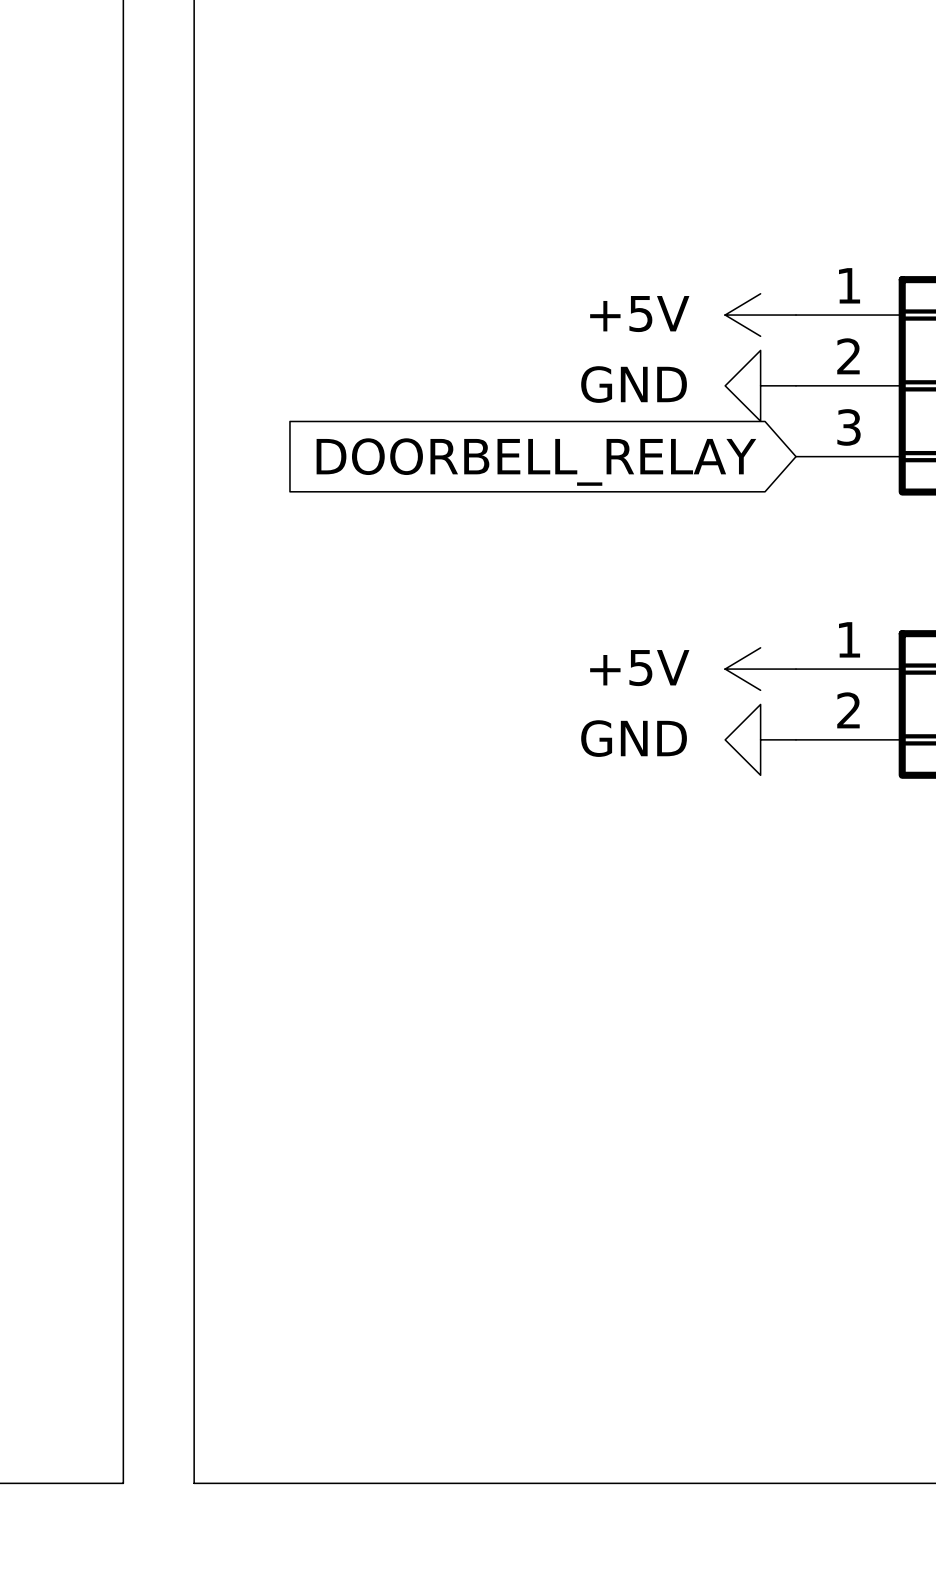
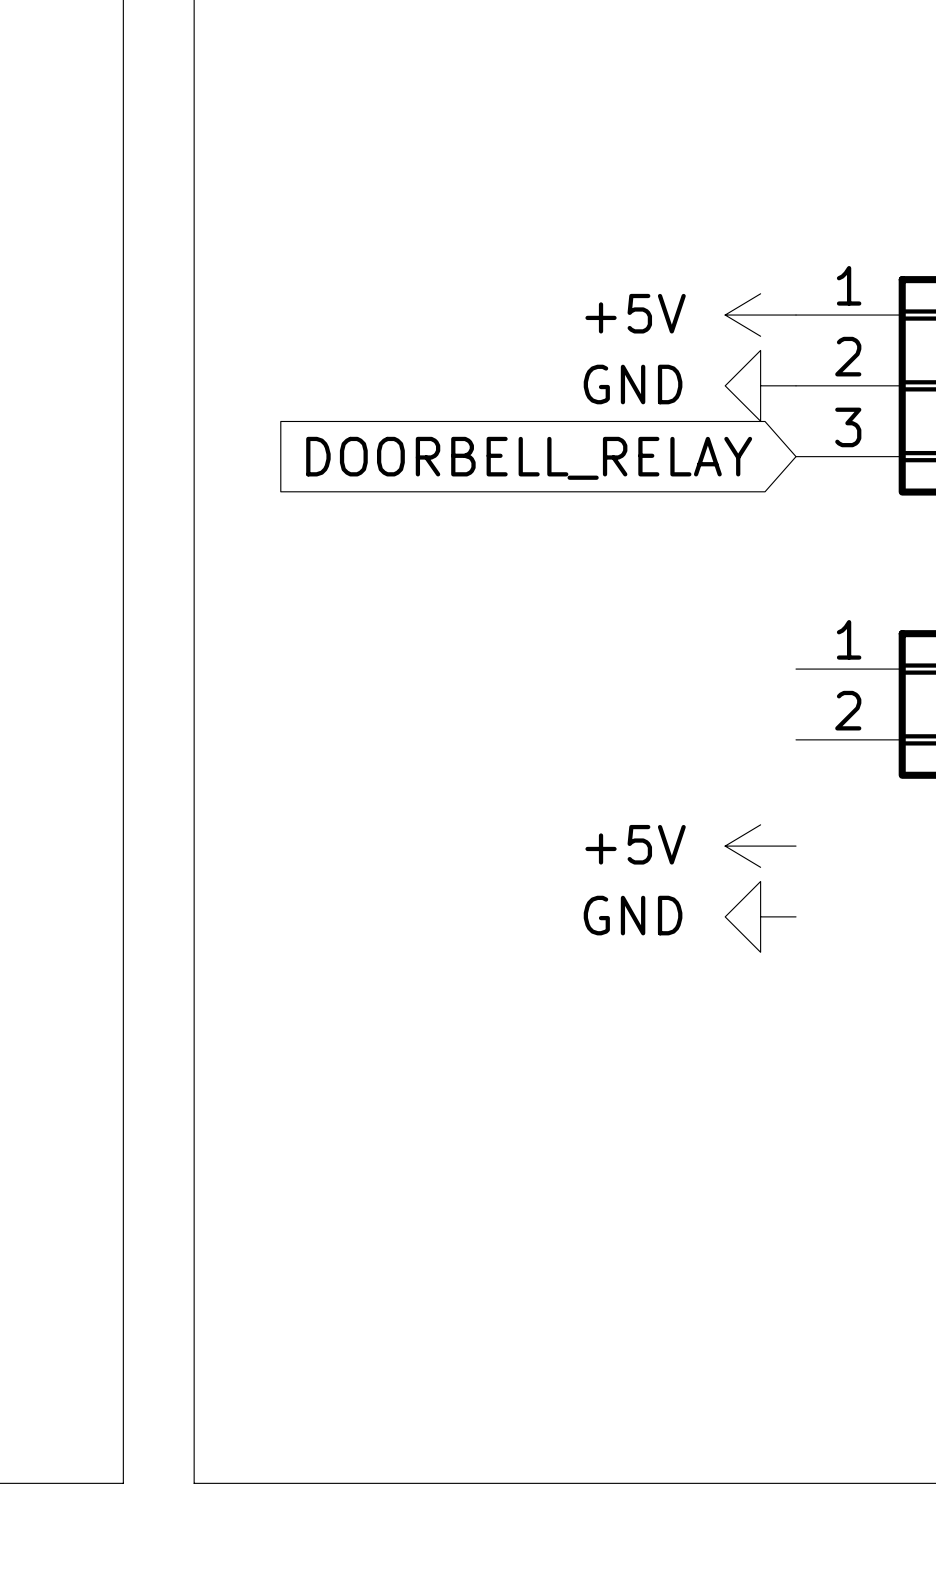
power symbol position: +5V (760, 669) -> +5V (760, 846)
power symbol position: GND (760, 739) -> GND (760, 916)

